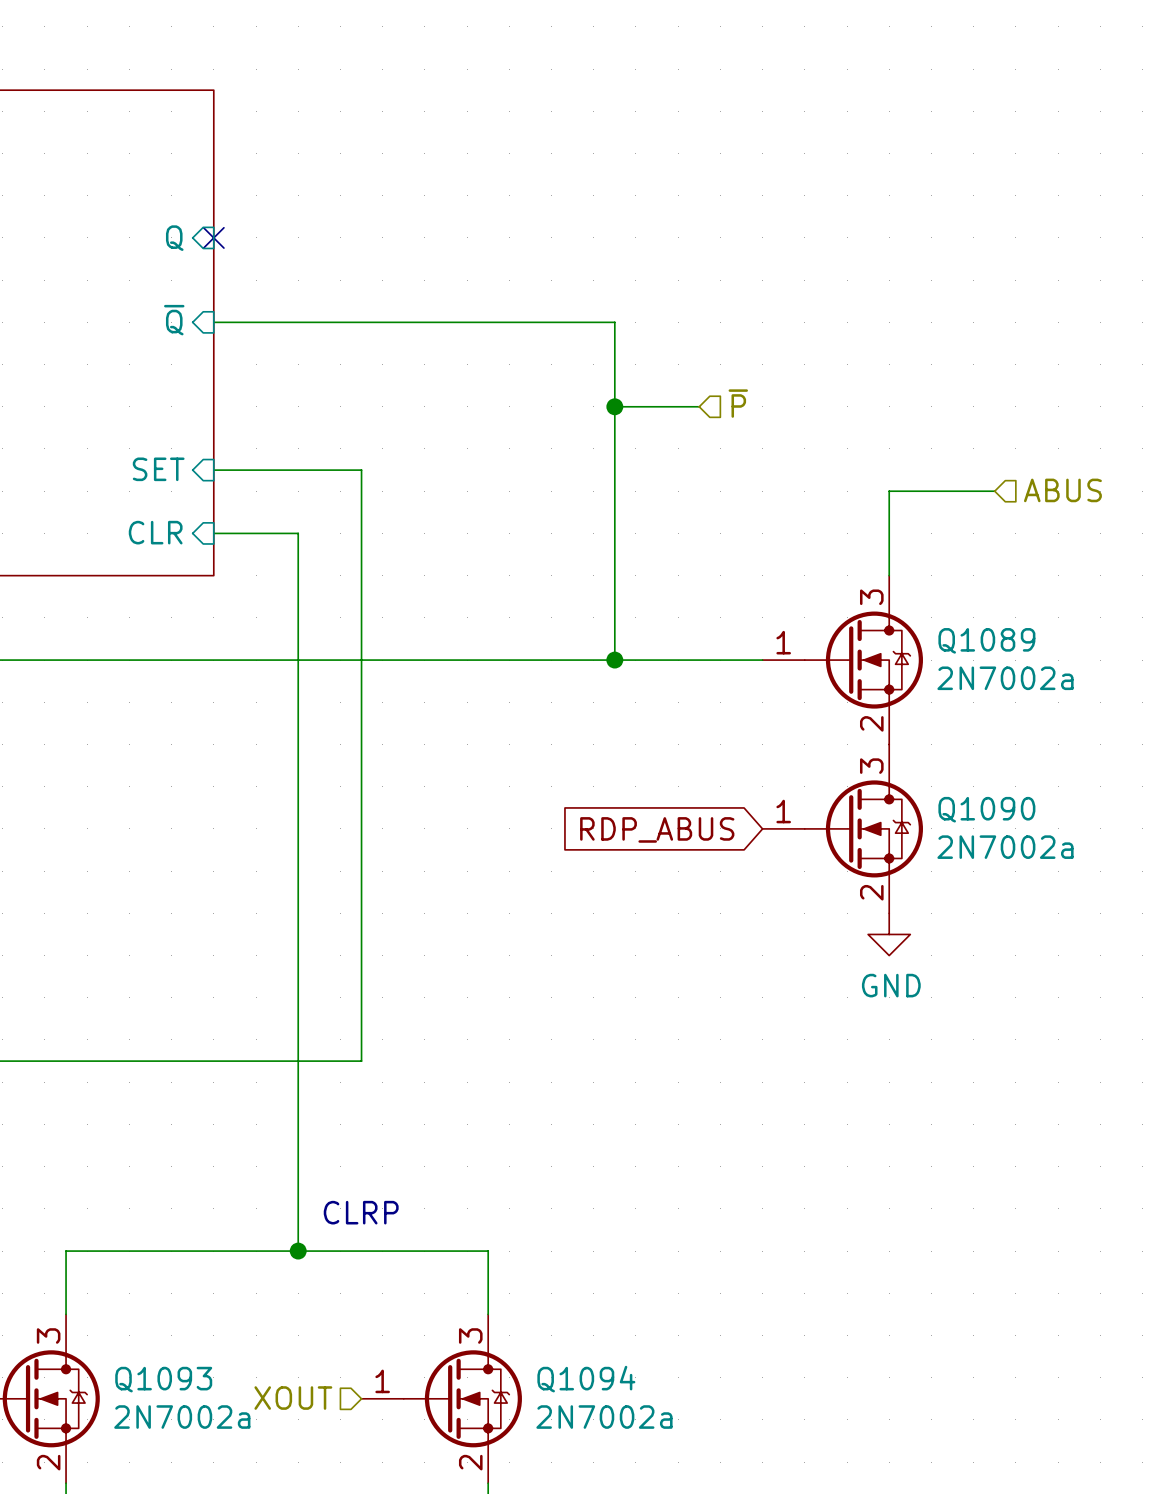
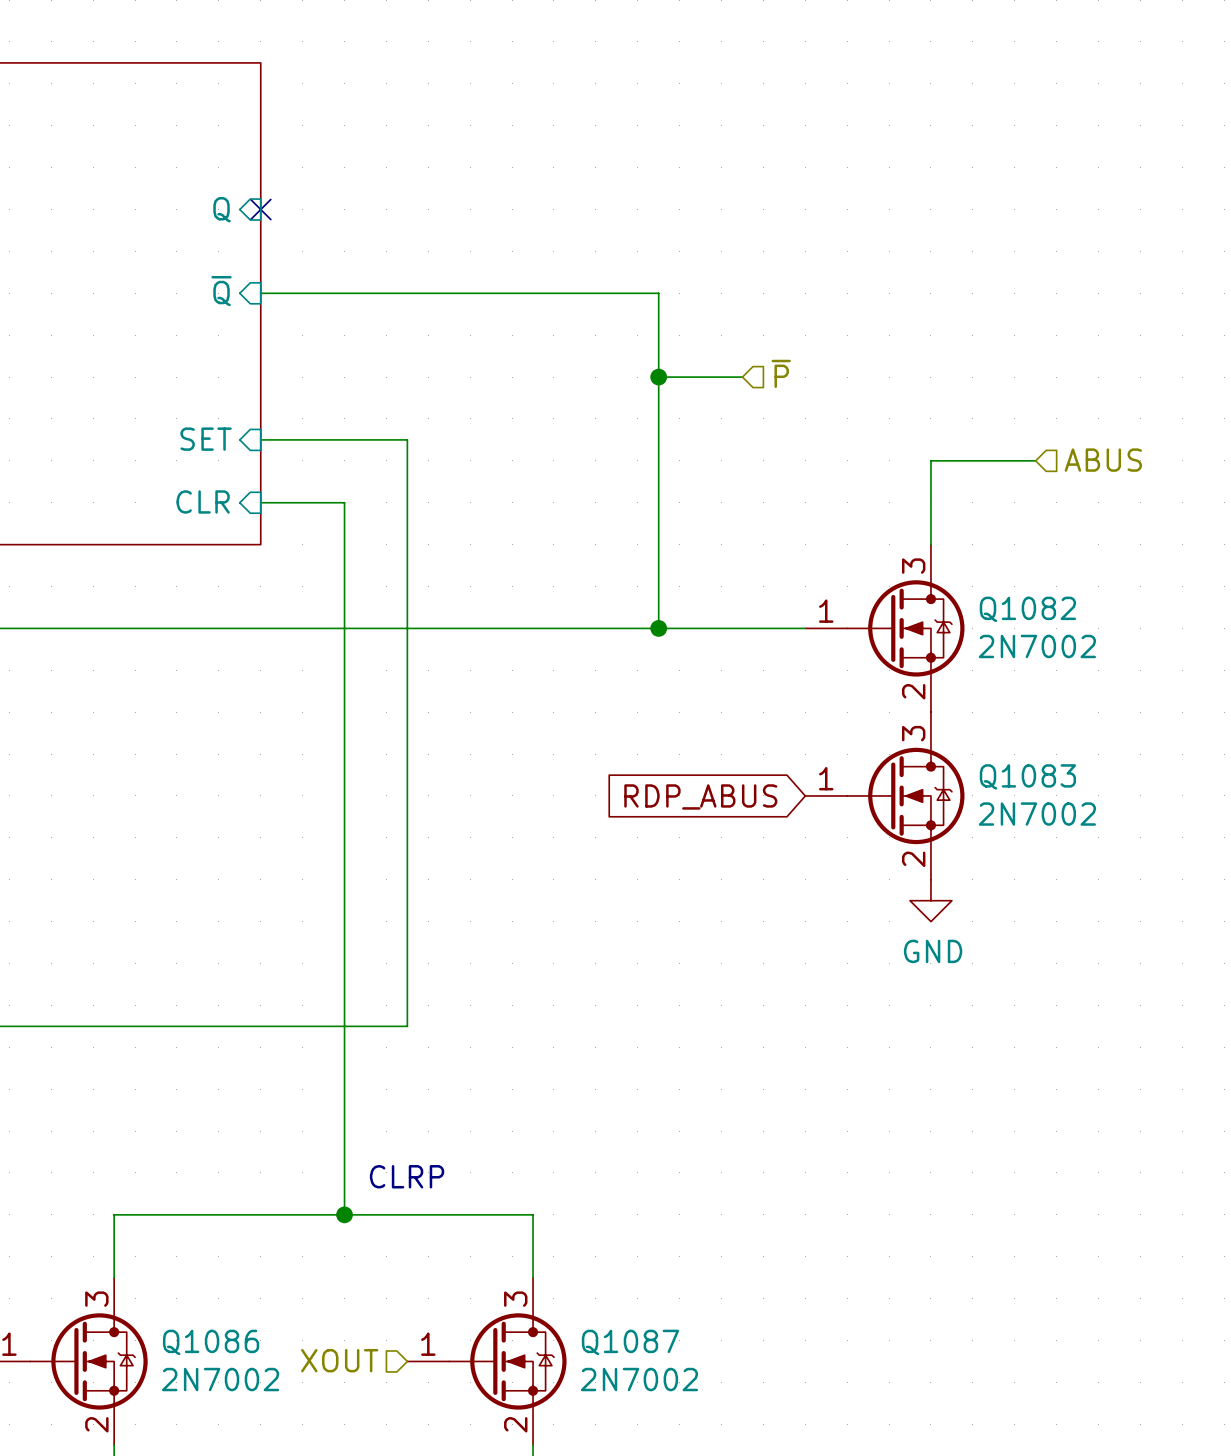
Q1089 name: Q1089 (986, 640) -> Q1082 (1027, 609)
Q1089 value: 2N7002a (1005, 678) -> 2N7002 (1037, 646)
Q1090 name: Q1090 (986, 809) -> Q1083 (1027, 776)
Q1090 value: 2N7002a (1005, 847) -> 2N7002 (1037, 814)
Q1093 name: Q1093 (163, 1379) -> Q1086 (211, 1342)
Q1094 name: Q1094 (586, 1379) -> Q1087 (630, 1342)
Q1093 value: 2N7002a (182, 1417) -> 2N7002 (220, 1379)
Q1094 value: 2N7002a (604, 1417) -> 2N7002 (639, 1379)

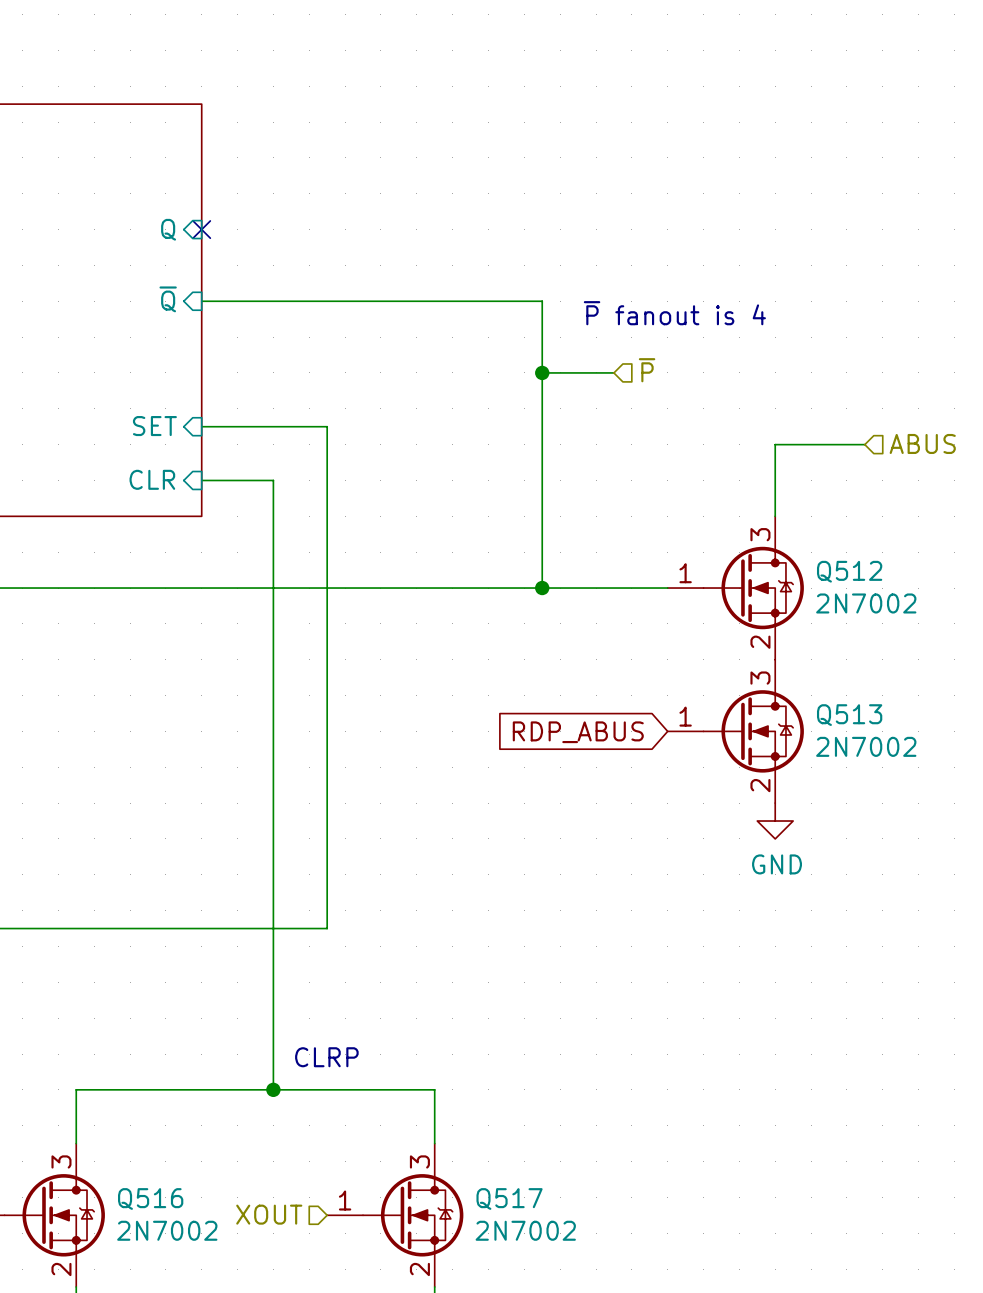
text: none -> ~{P} fanout is 4 (674, 313)
Q1082 name: Q1082 (1027, 609) -> Q512 (849, 571)
Q1083 name: Q1083 (1027, 776) -> Q513 (849, 715)
Q1086 name: Q1086 (211, 1342) -> Q516 (150, 1198)
Q1087 name: Q1087 (630, 1342) -> Q517 (509, 1198)

